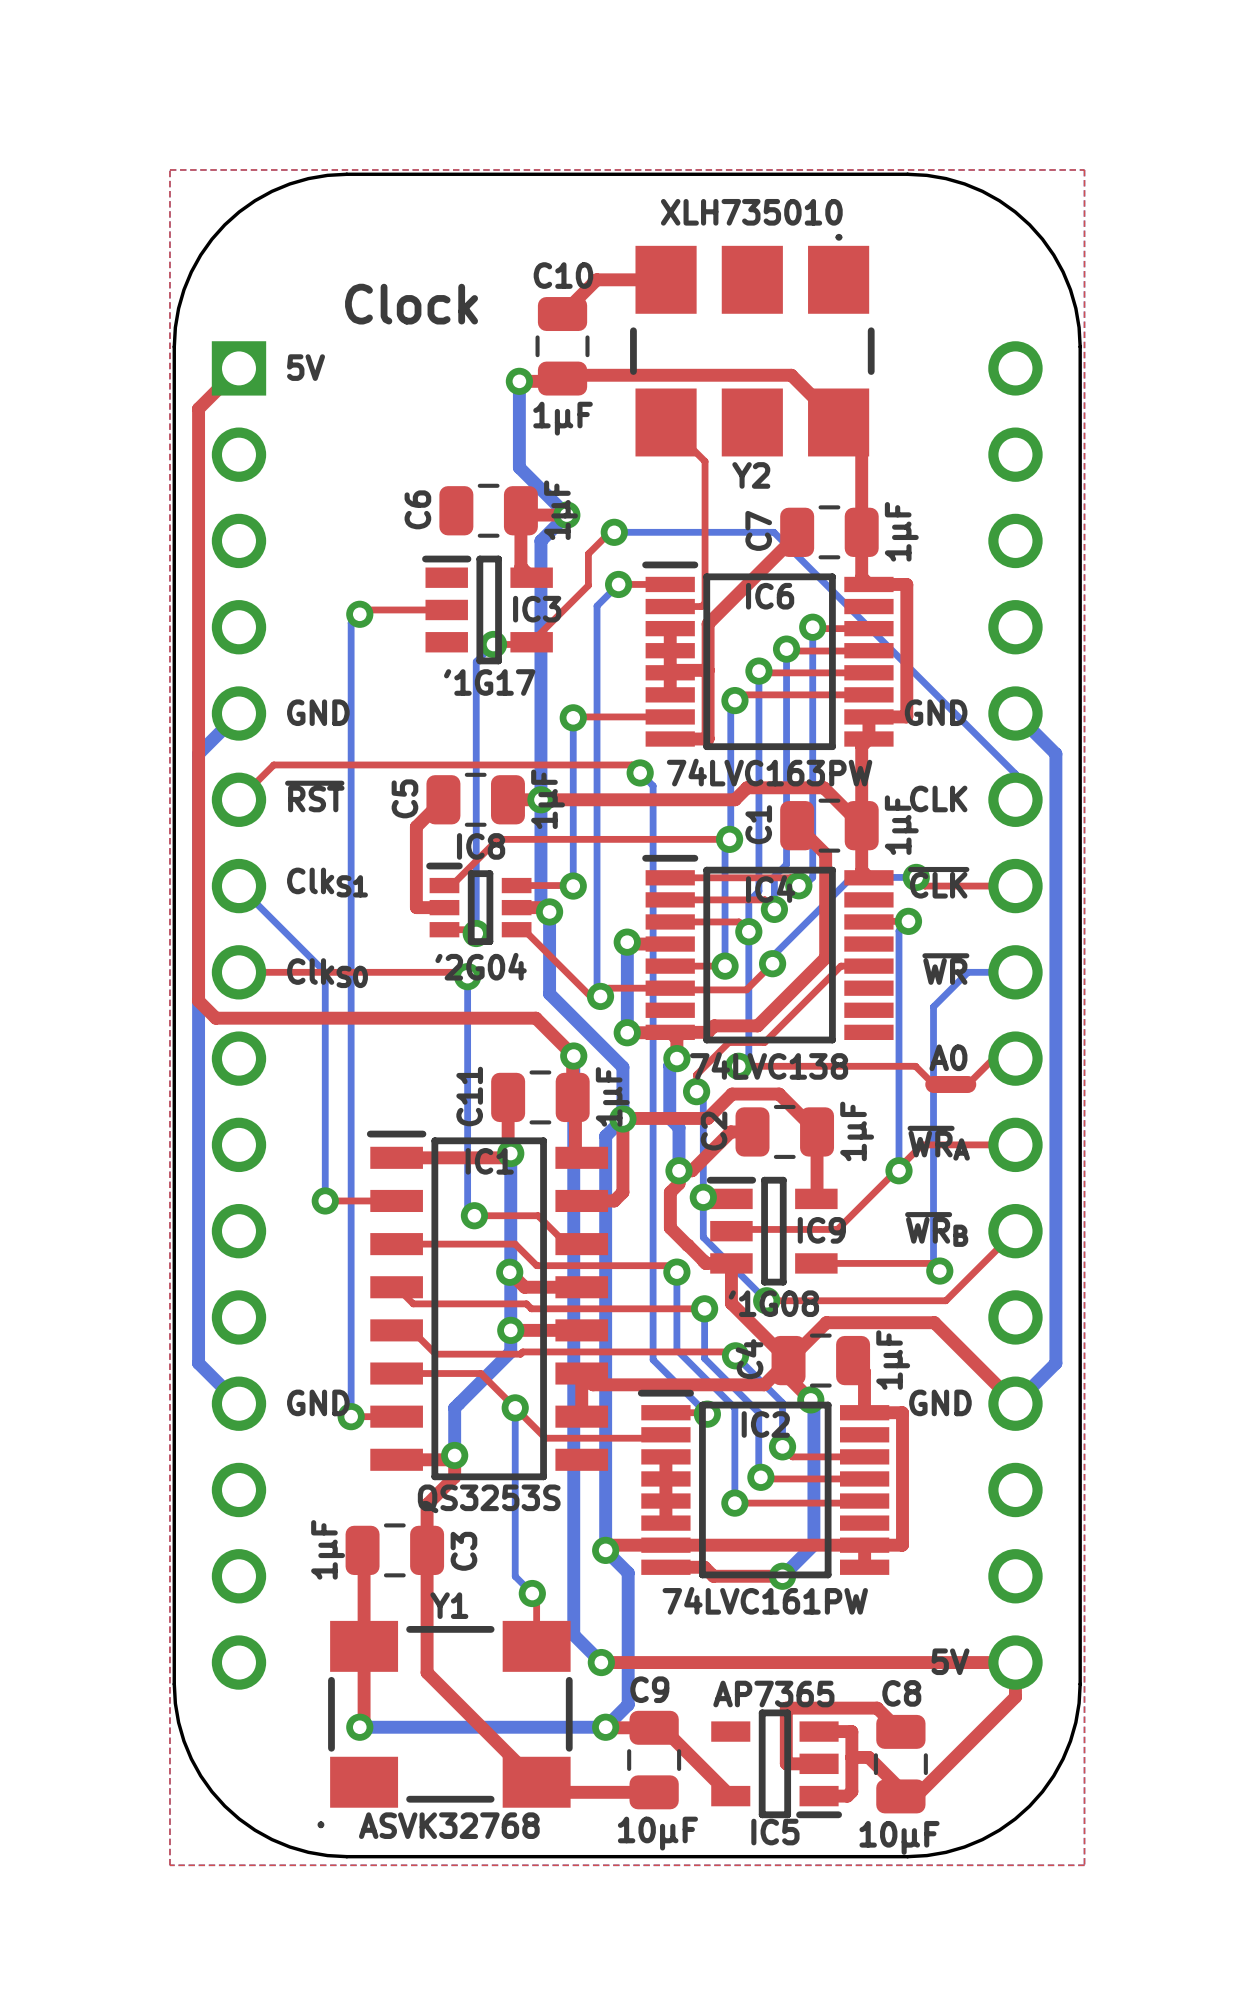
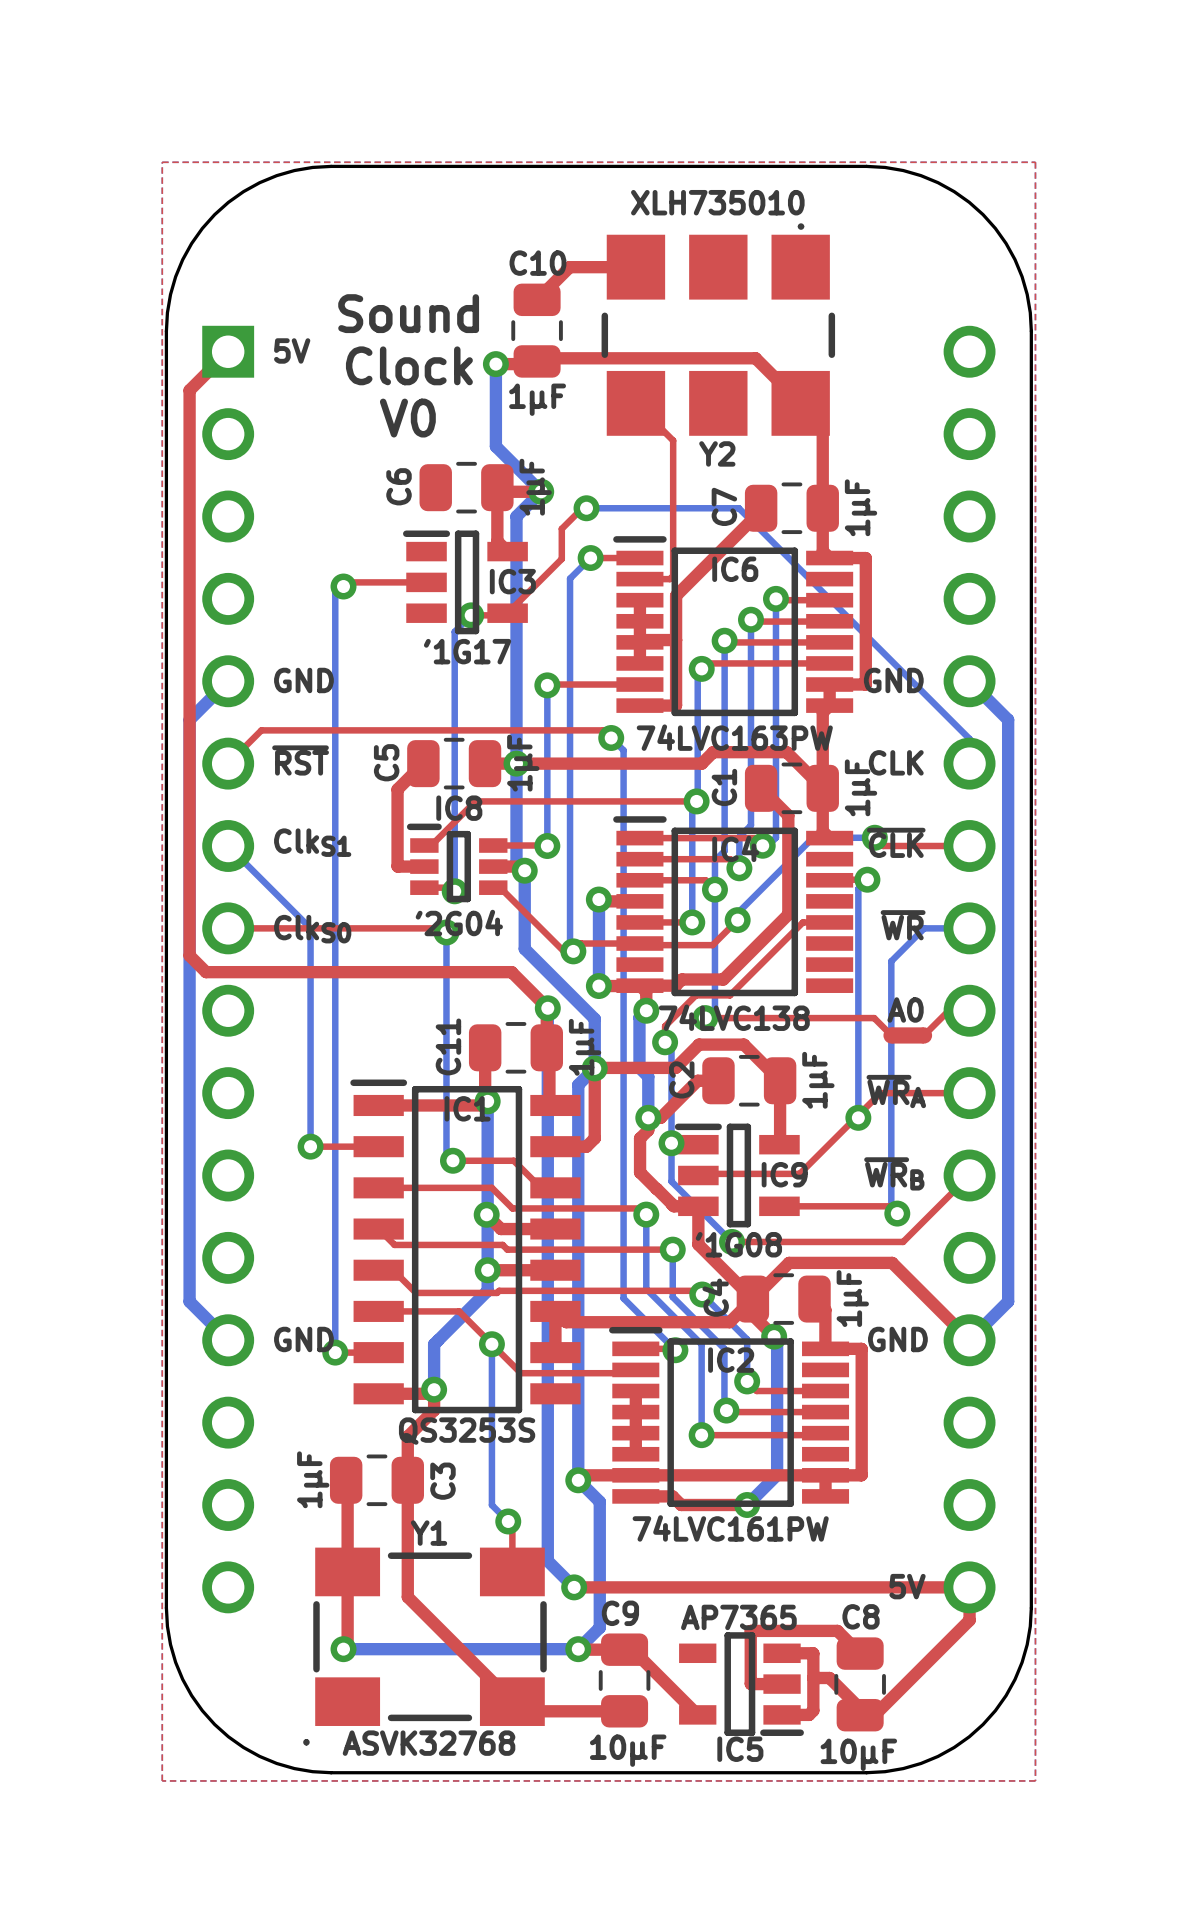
text: Clock (411, 304) -> Sound (408, 313)
text: none -> Clock (409, 365)
text: none -> V0 (407, 418)

